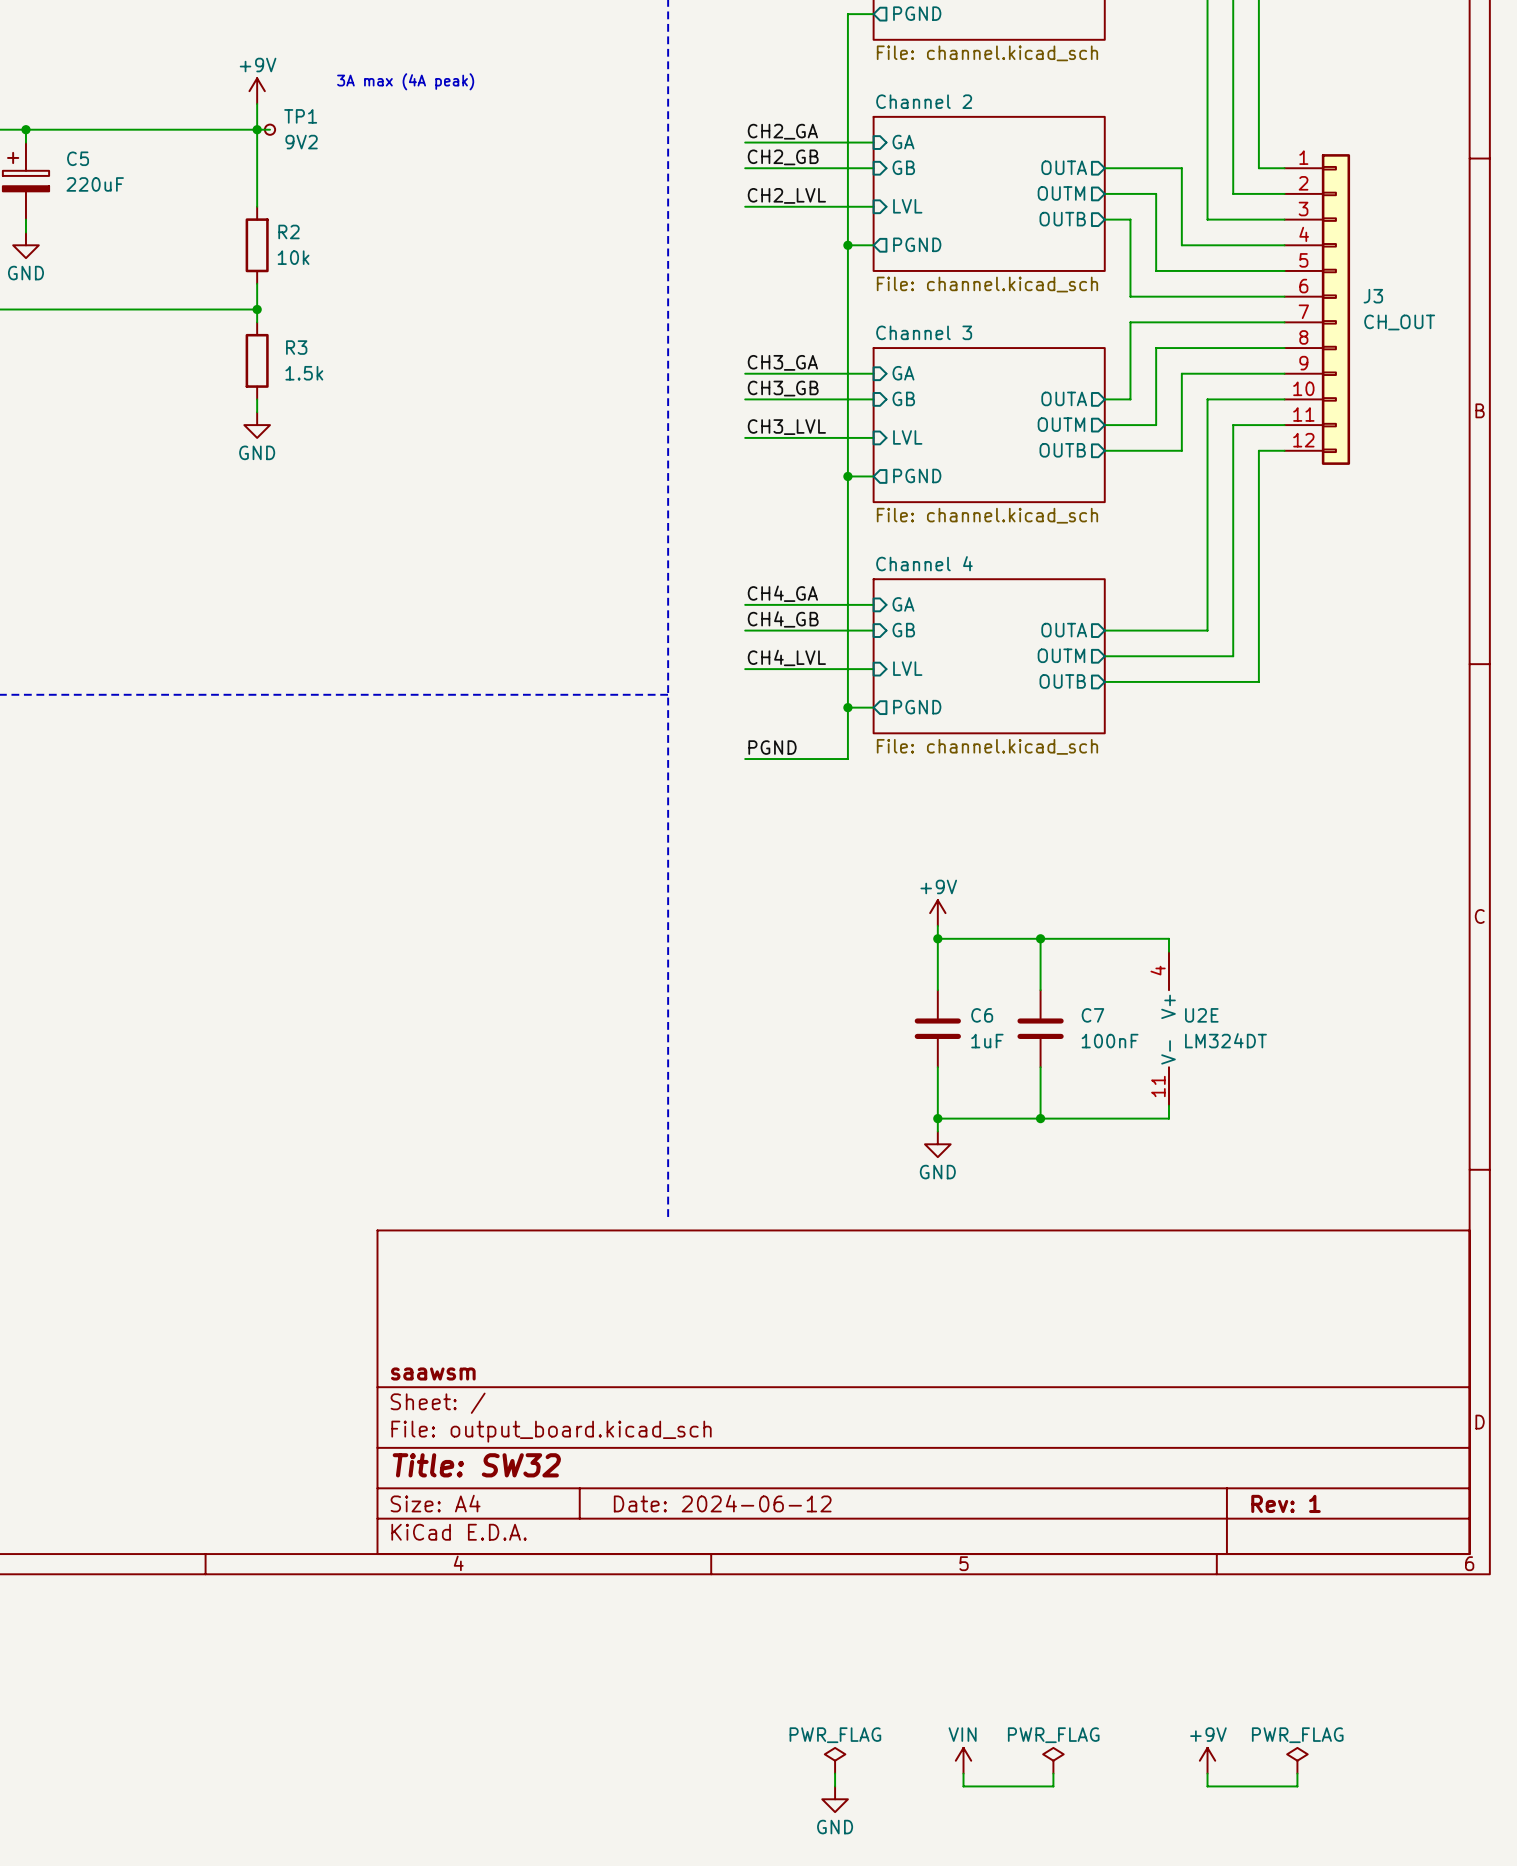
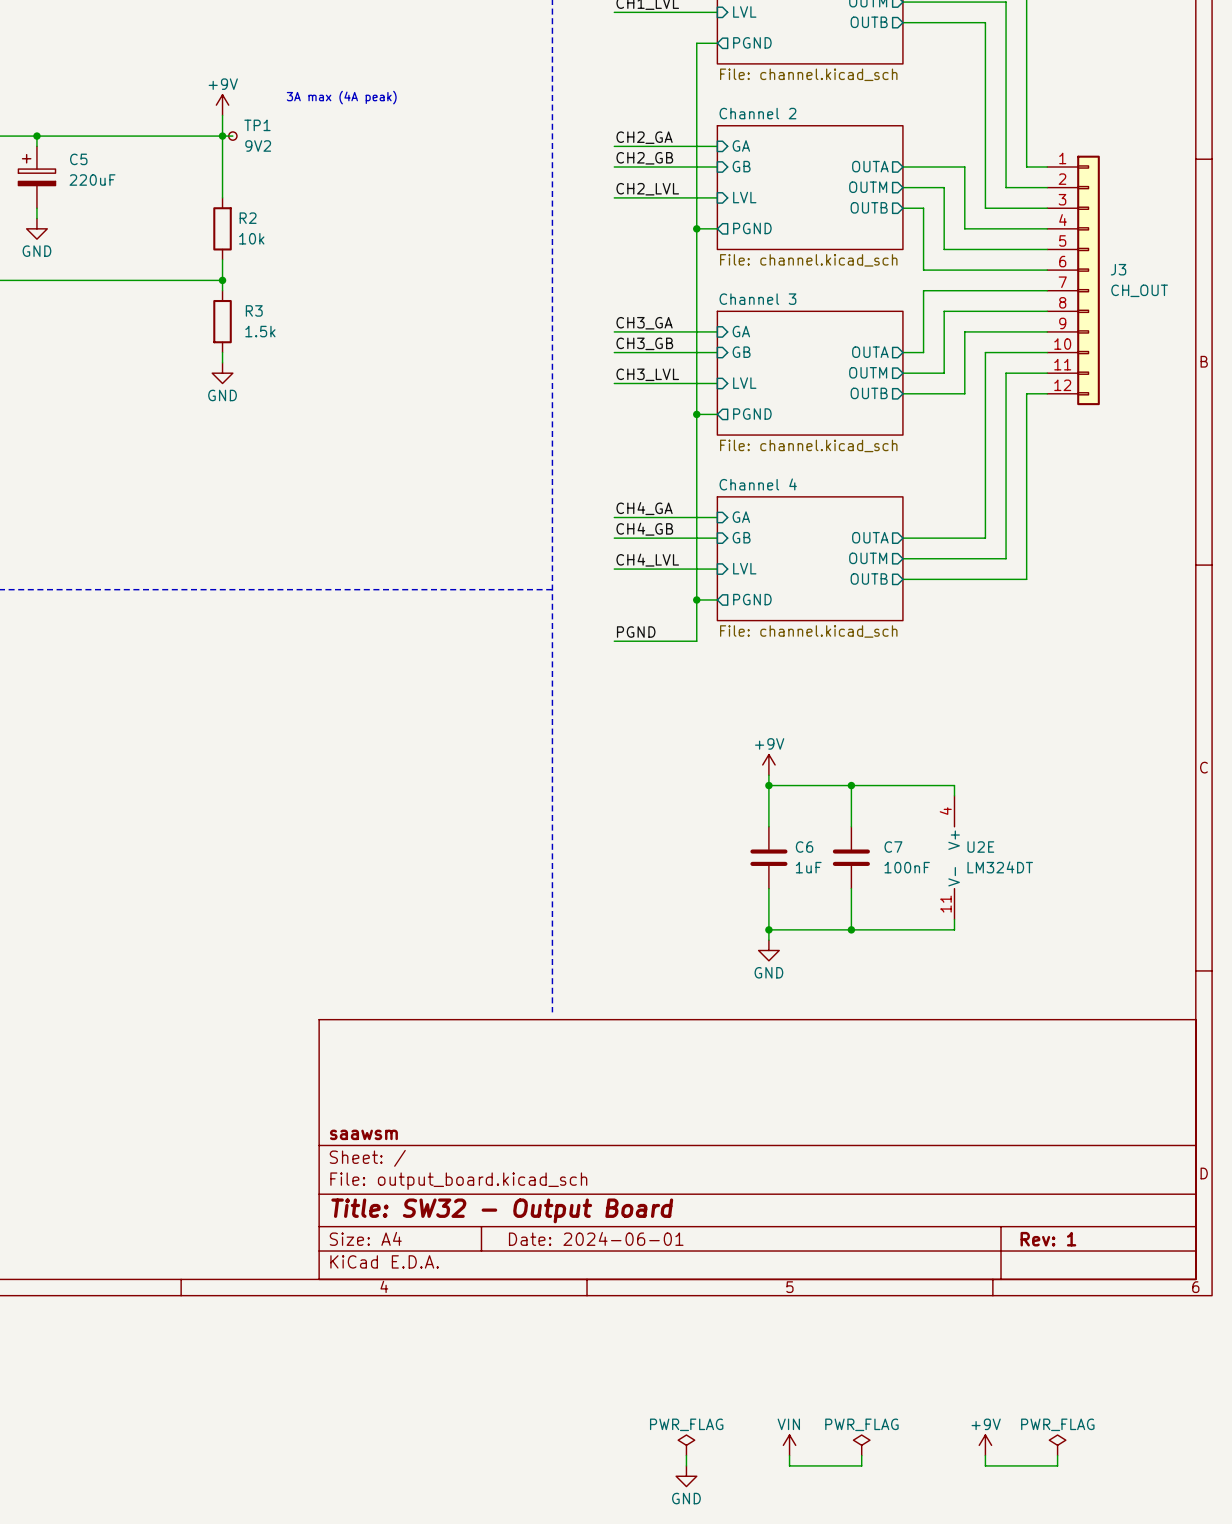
title block: Title: SW32 (476, 1465) -> Title: SW32 - Output Board (502, 1210)
title block: Date: 2024-06-12 (722, 1503) -> Date: 2024-06-01 (596, 1238)

